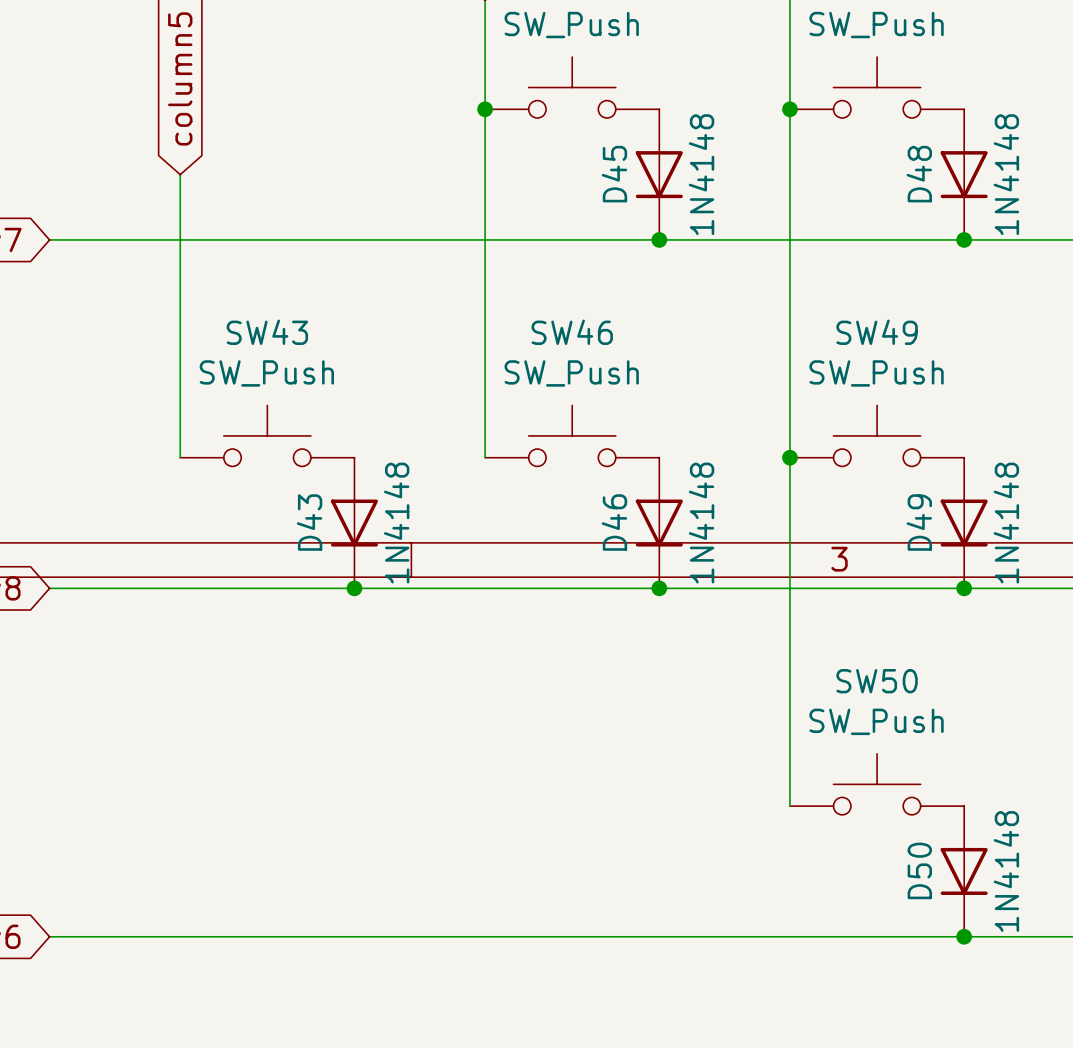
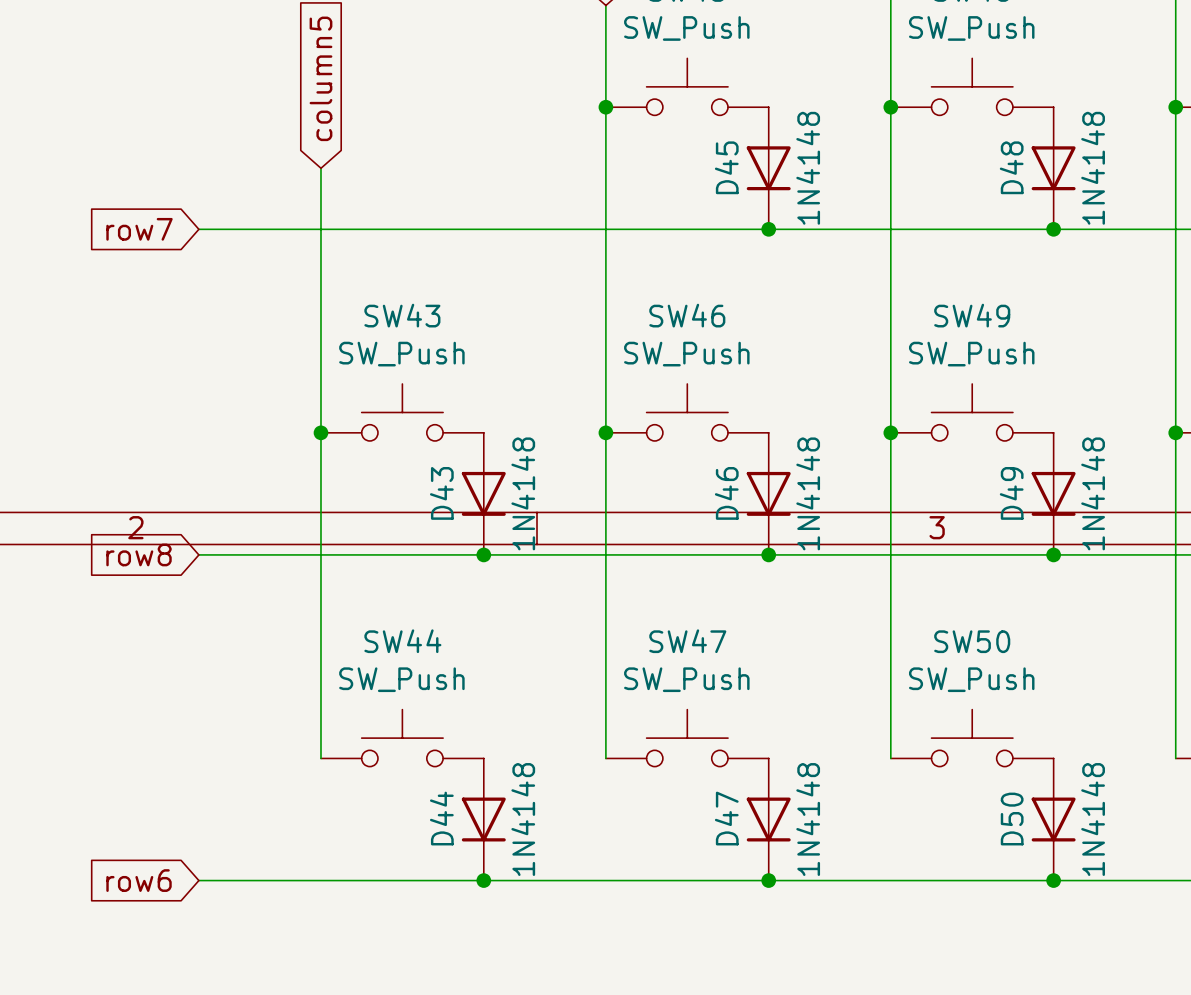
wire: none -> (320, 432) (320, 758)
junction: none -> (320, 432)
wire: none -> (605, 432) (605, 758)
junction: none -> (605, 432)
SW44: none -> SW_Push (402, 738)
SW47: none -> SW_Push (687, 738)
D44: none -> 1N4148 (483, 819)
D47: none -> 1N4148 (768, 819)
junction: none -> (483, 880)
junction: none -> (768, 880)

